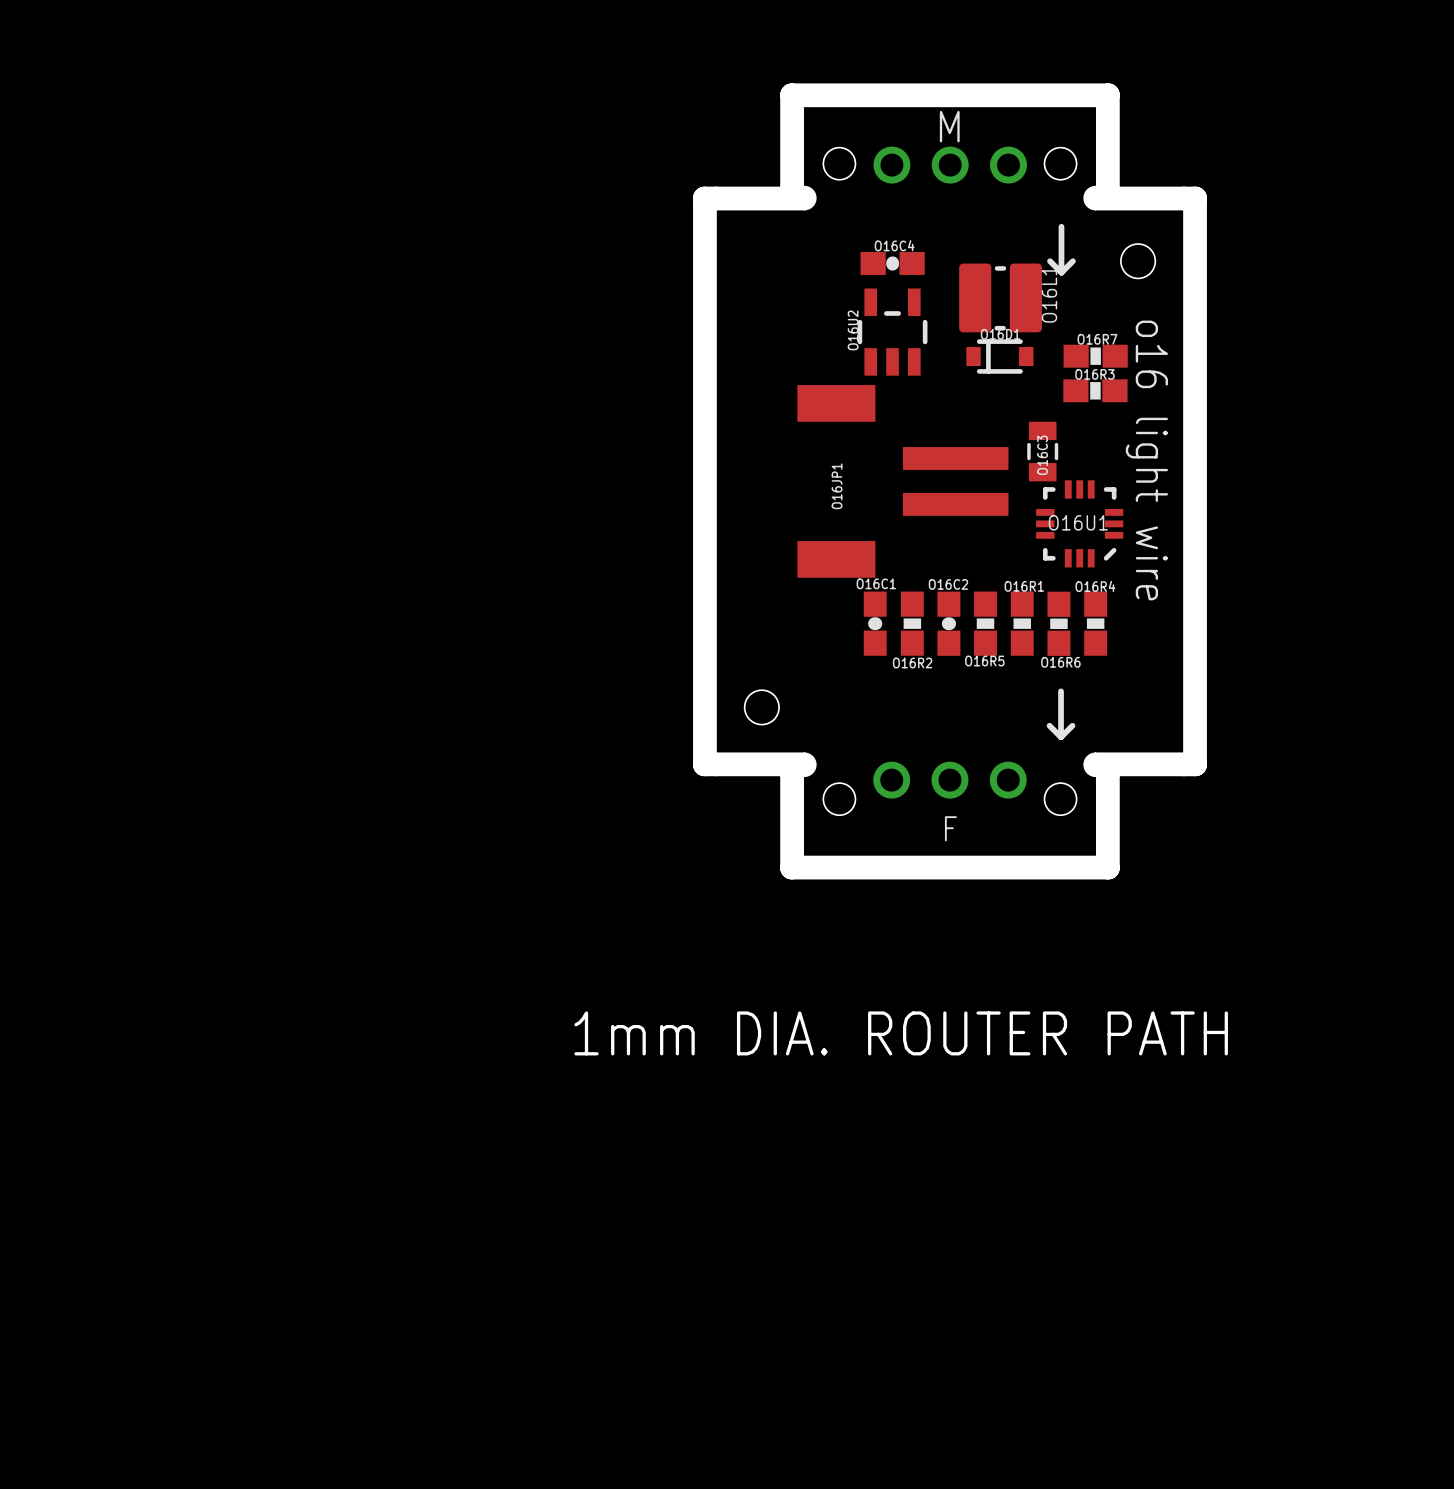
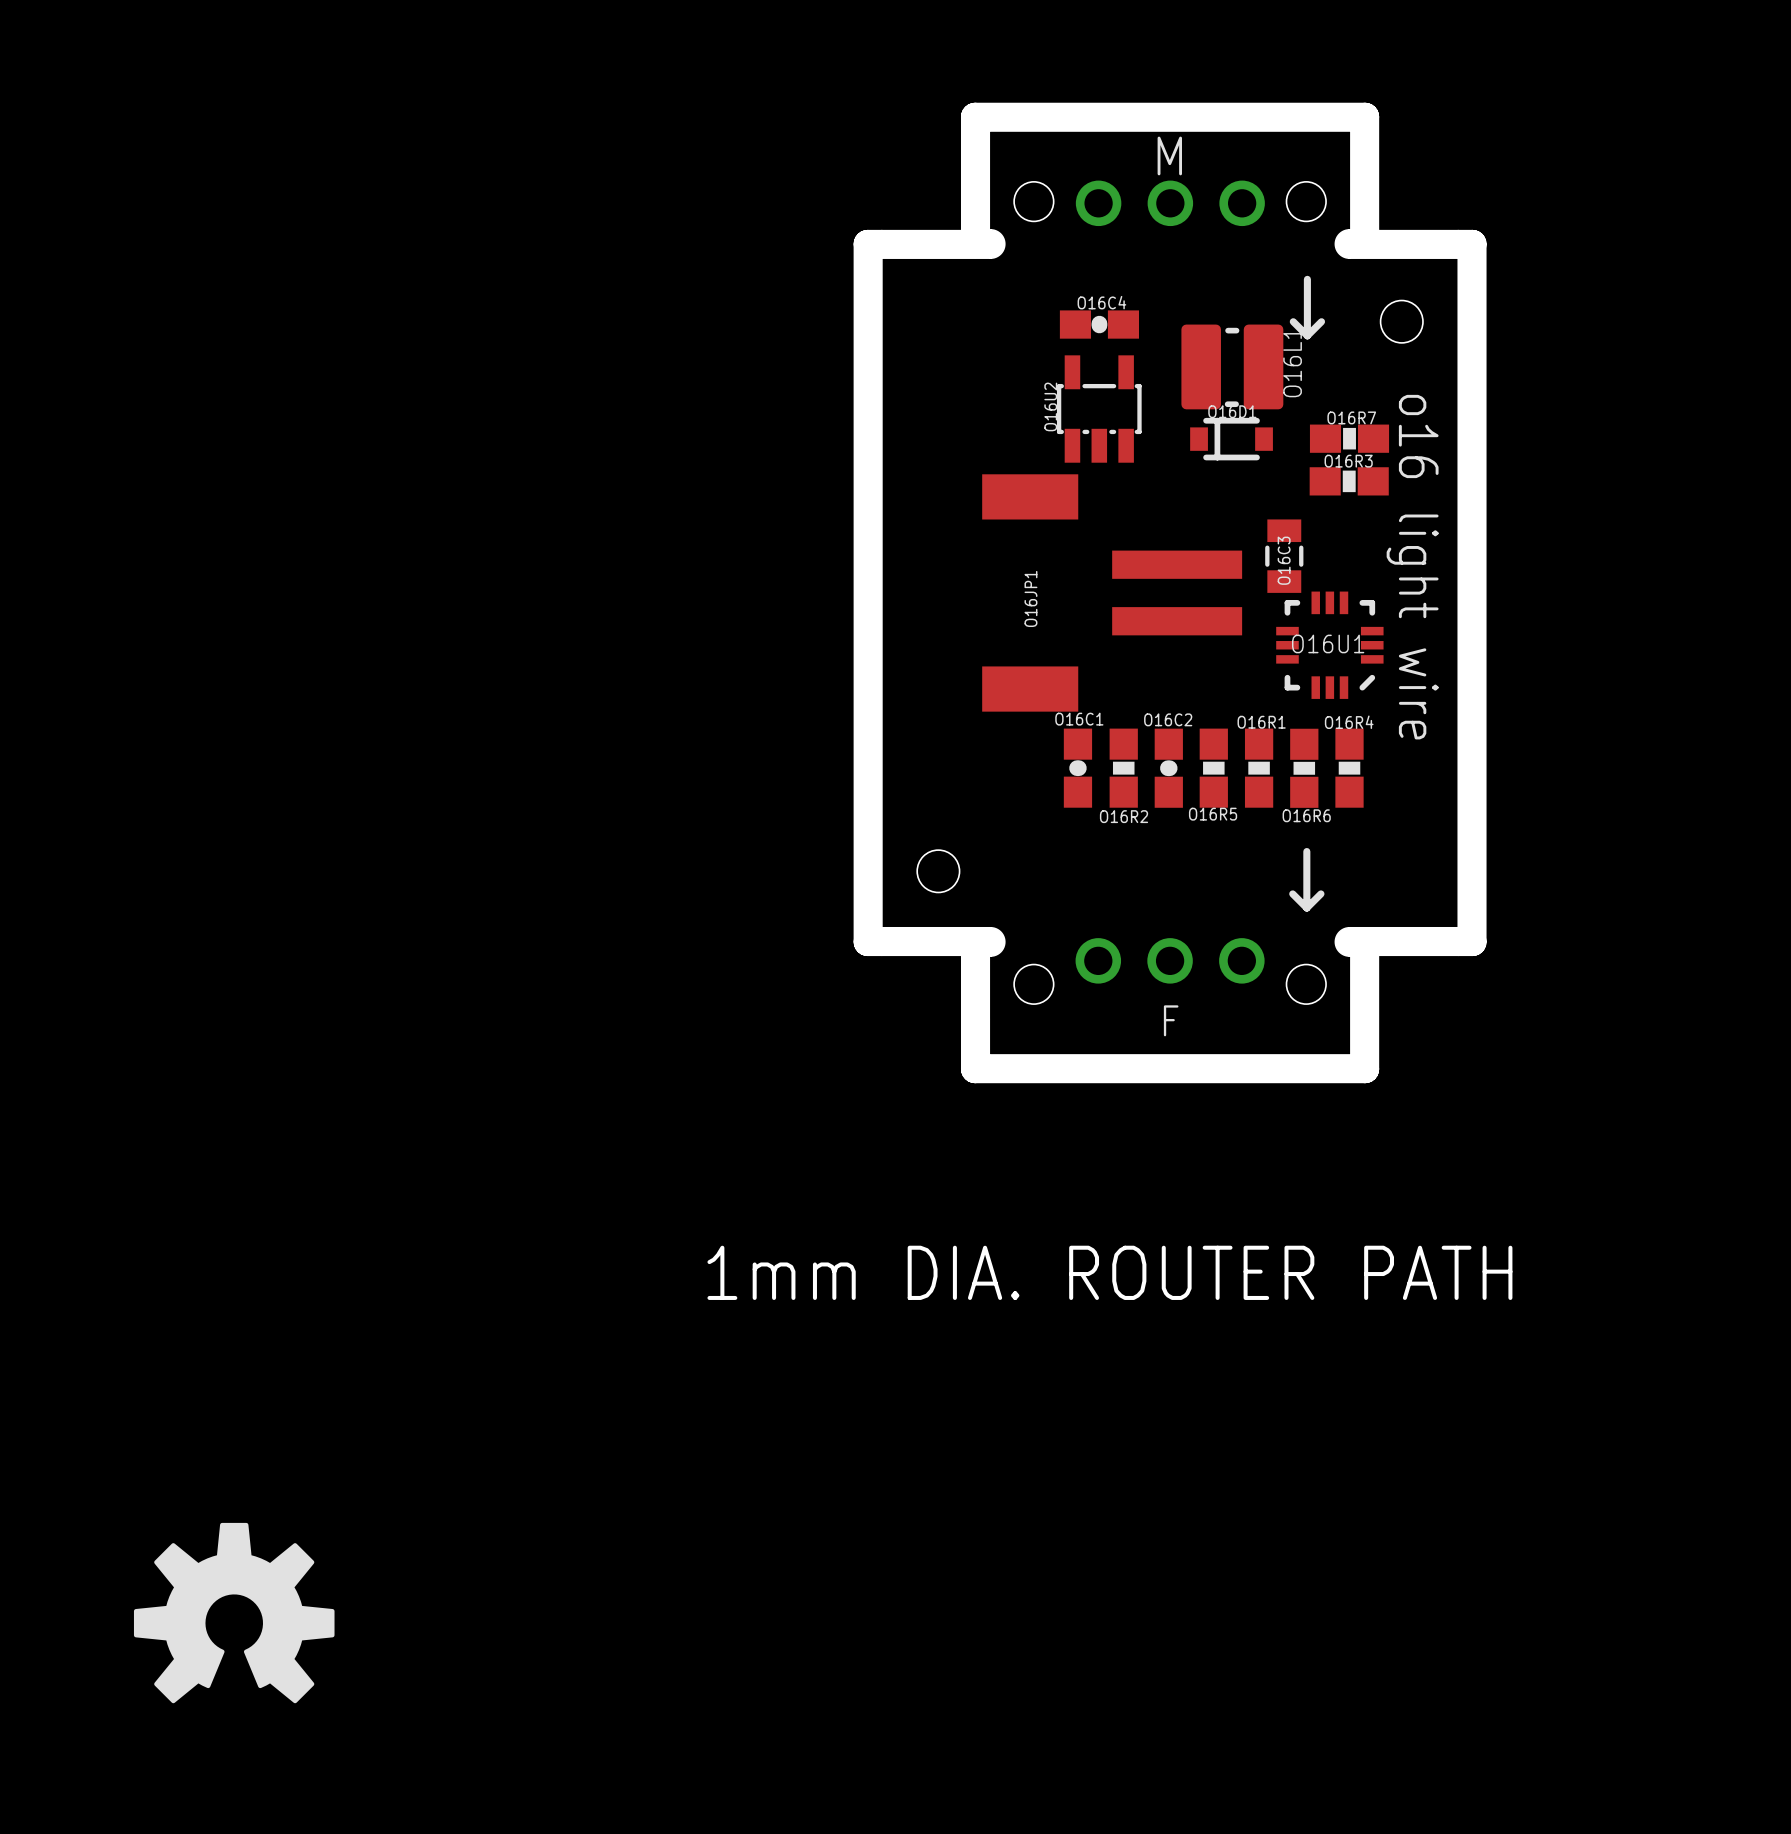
O16U2 footprint: [857, 288, 928, 376] -> [1056, 355, 1142, 463]
drawing: none -> [133, 1522, 335, 1704]

